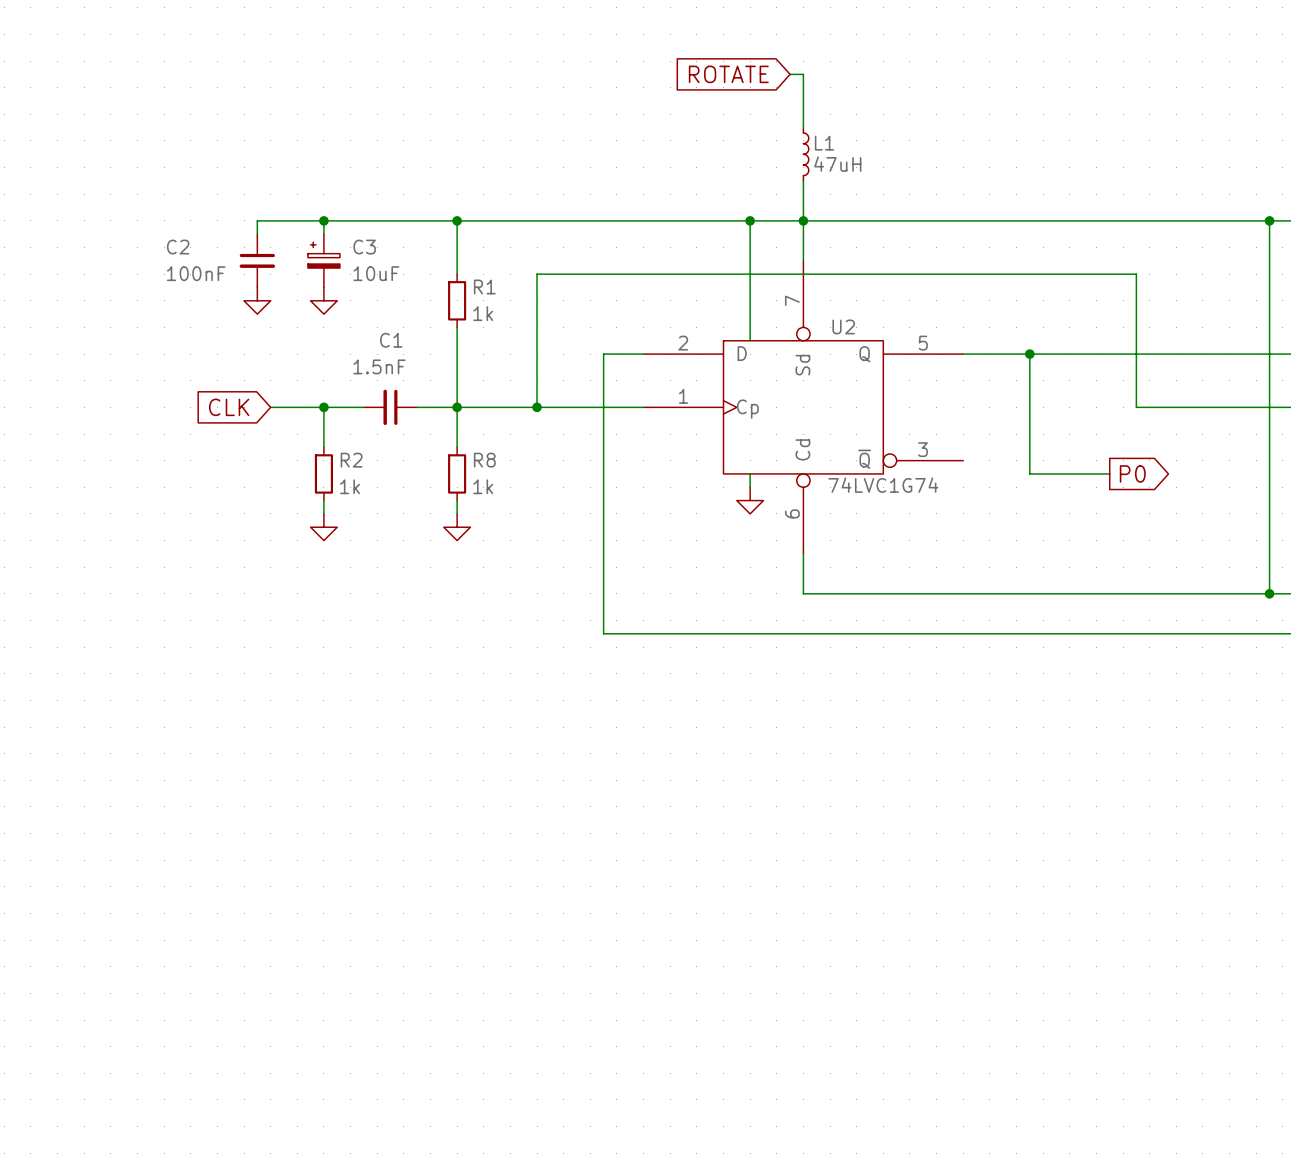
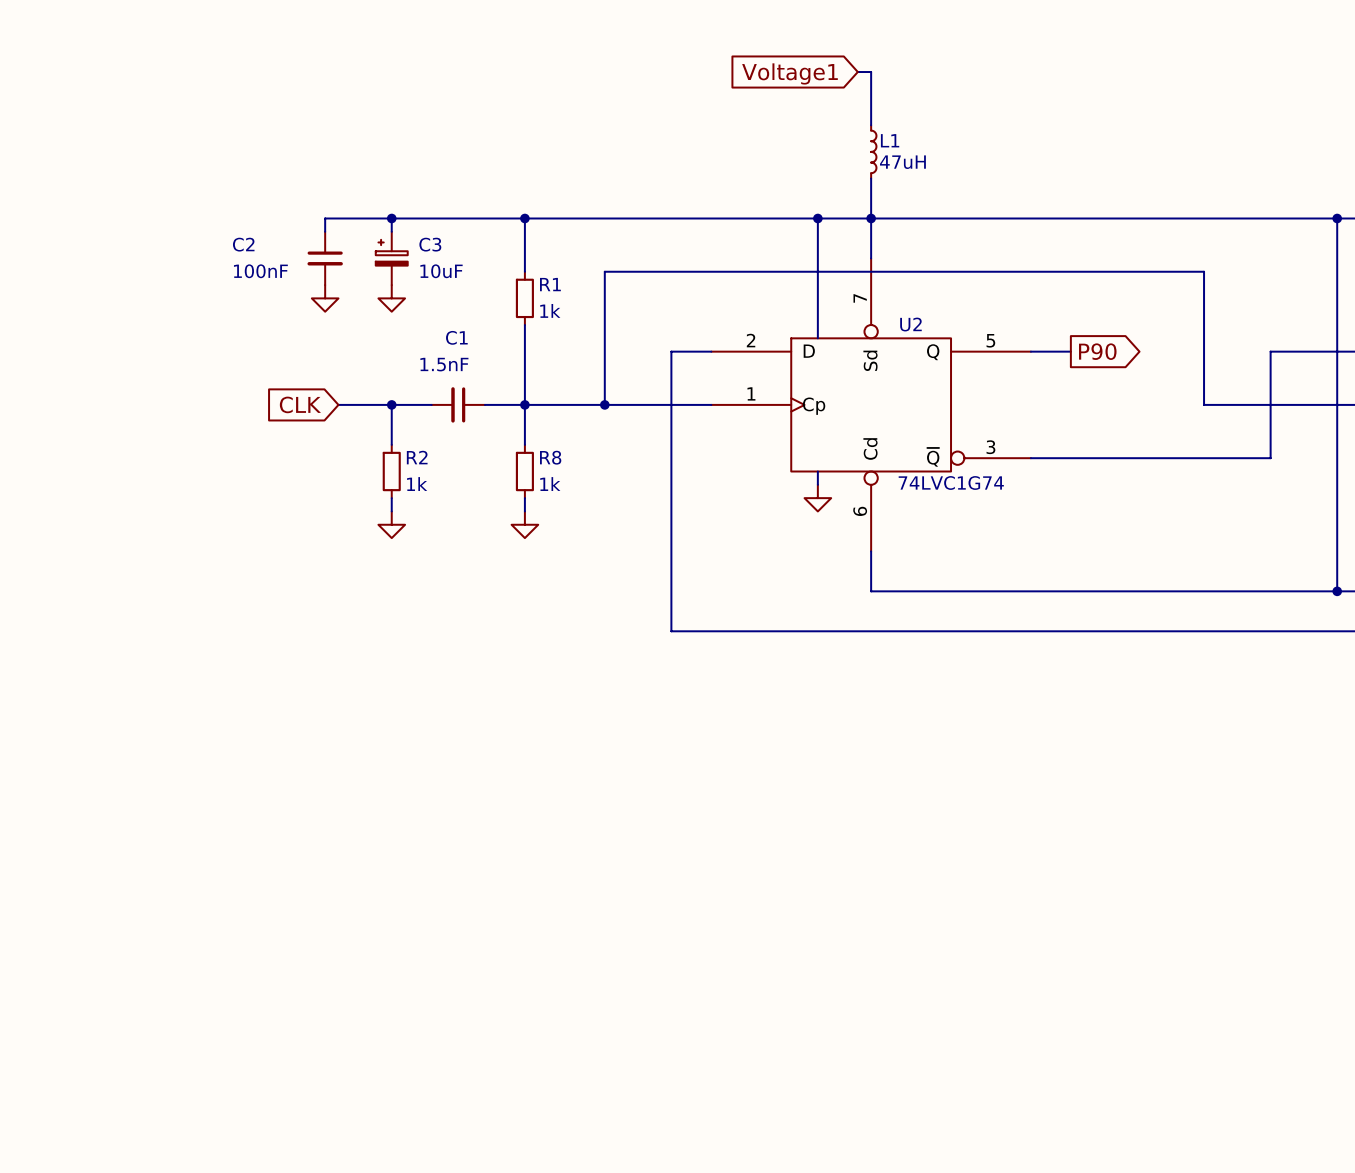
global label: ROTATE (728, 74) -> Voltage1 (789, 73)
wire: (1003, 354) (1202, 354) -> (1030, 458) (1270, 458) (1270, 351)
wire: (1029, 354) (1029, 473) (1109, 473) -> none
junction: (1029, 354) -> none
global label: none -> P90 (1097, 351)
global label: P0 (1132, 473) -> none

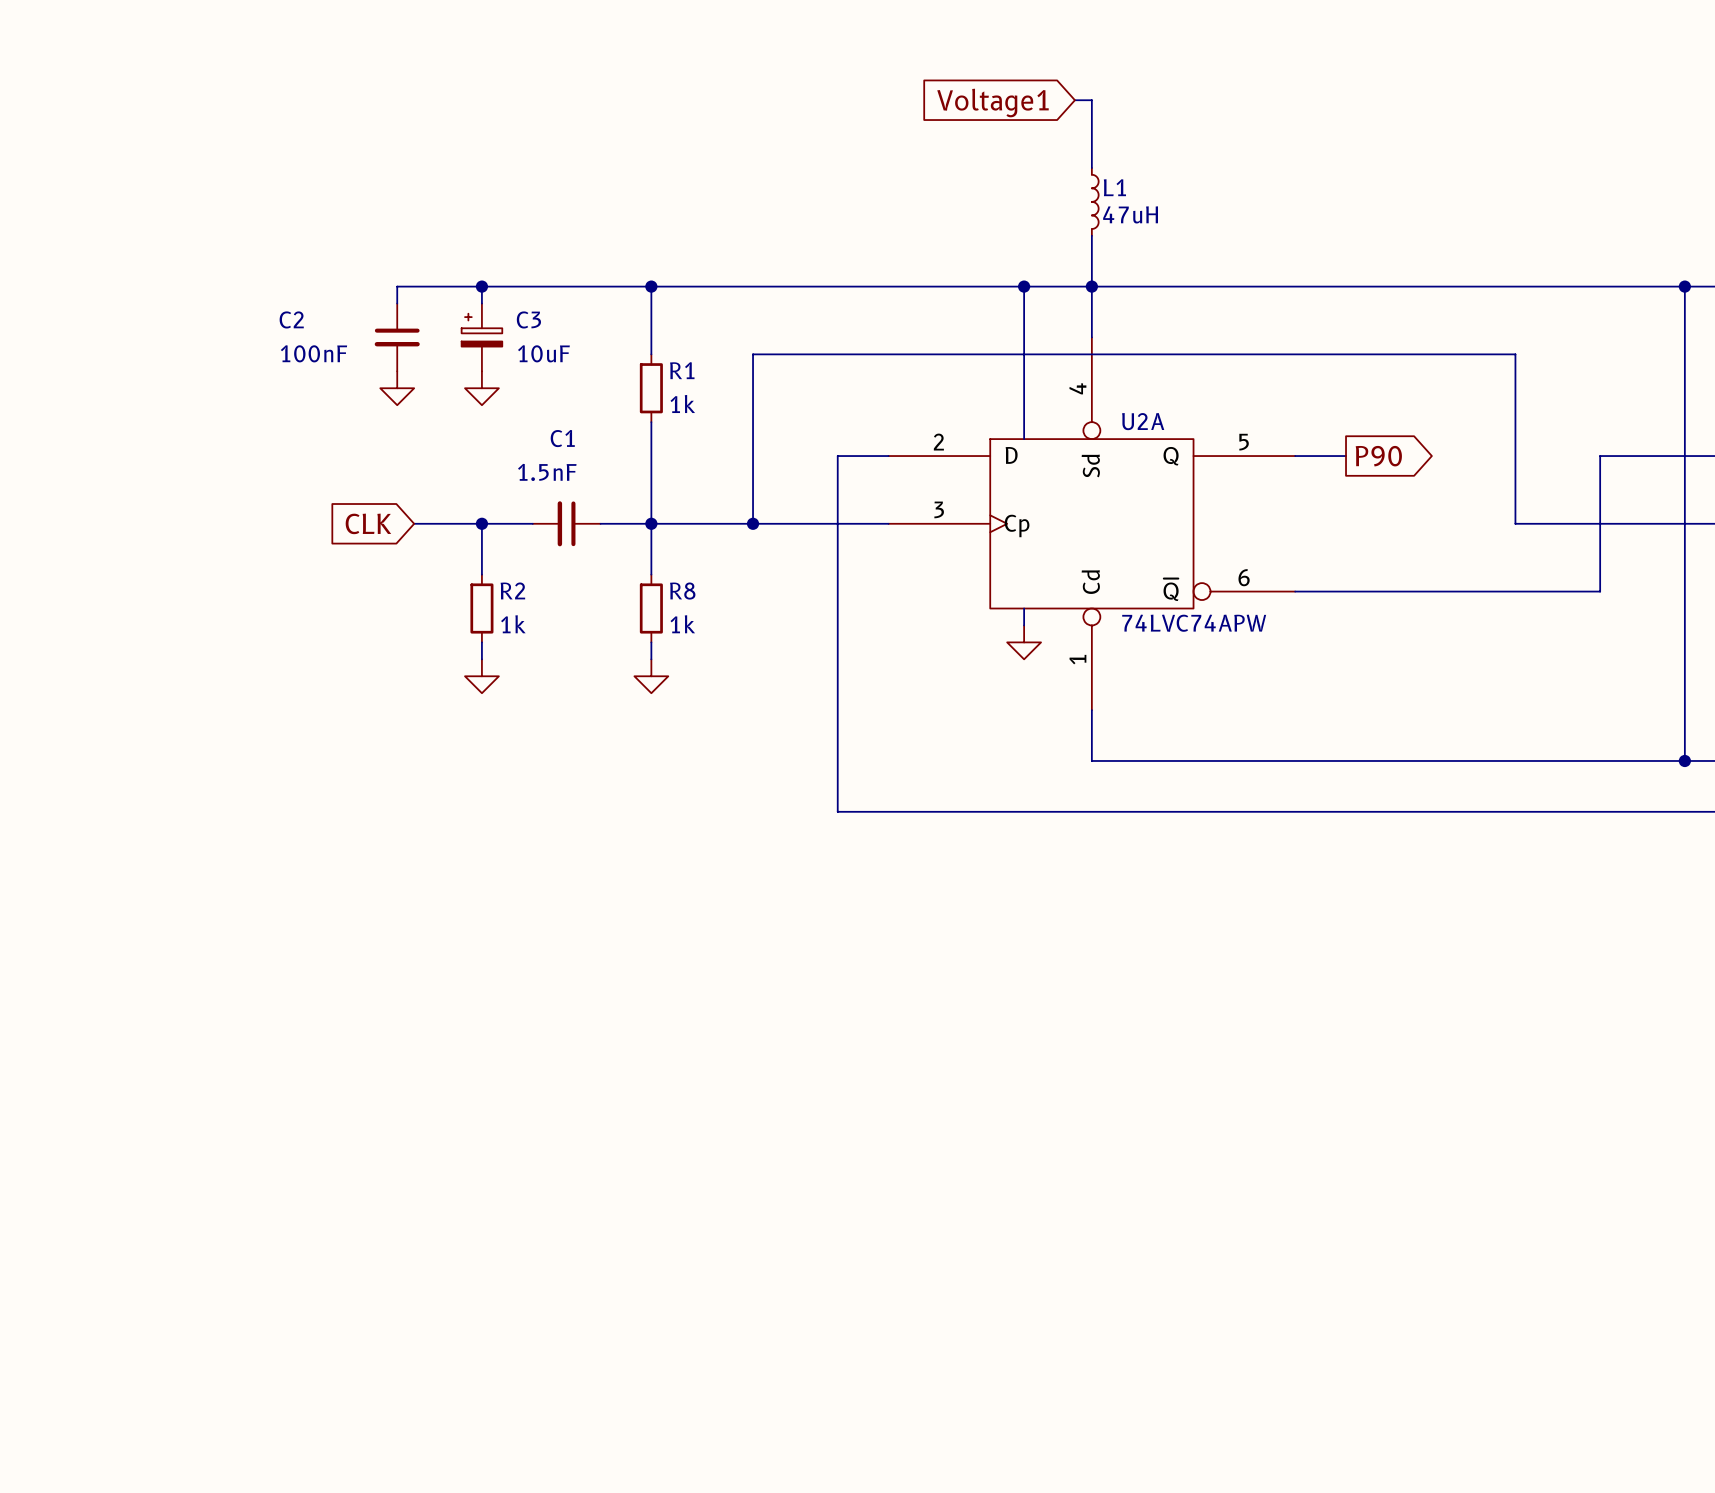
U2 pin number: 7 (860, 298) -> 4 (1077, 388)
U2 name: U2 (910, 324) -> U2A (1143, 421)
U2 pin number: 1 (751, 393) -> 3 (939, 509)
U2 pin number: 3 (990, 447) -> 6 (1244, 577)
U2 value: 74LVC1G74 (951, 482) -> 74LVC74APW (1194, 623)
U2 pin number: 6 (860, 511) -> 1 (1077, 659)

